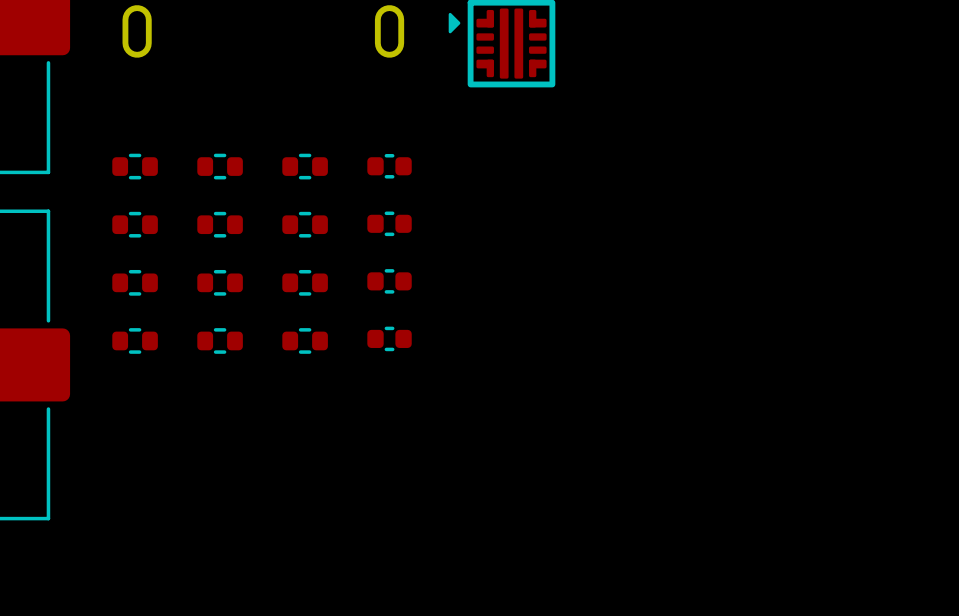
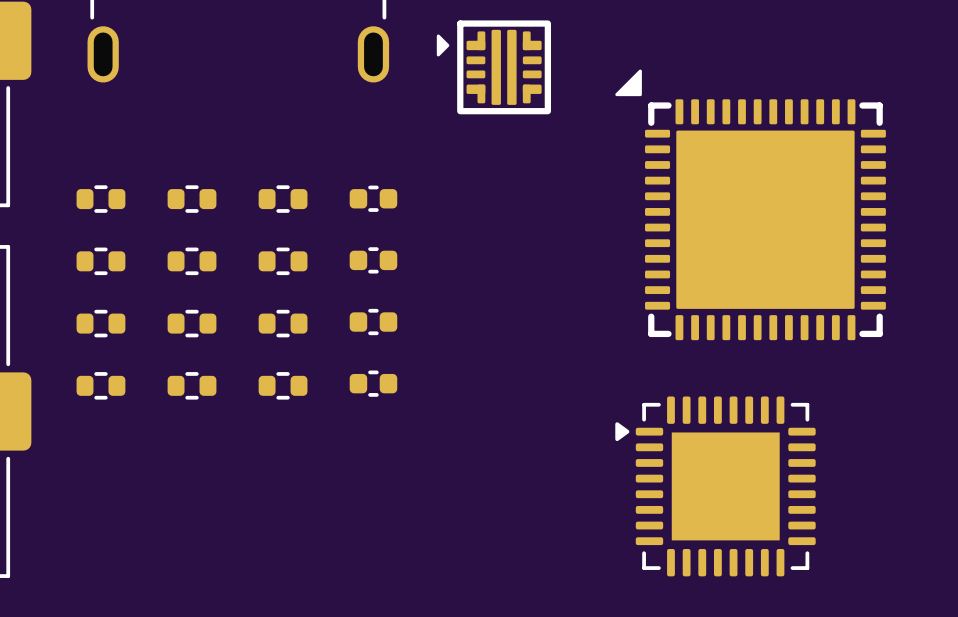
part: none -> (750, 204)
part: none -> (715, 486)

